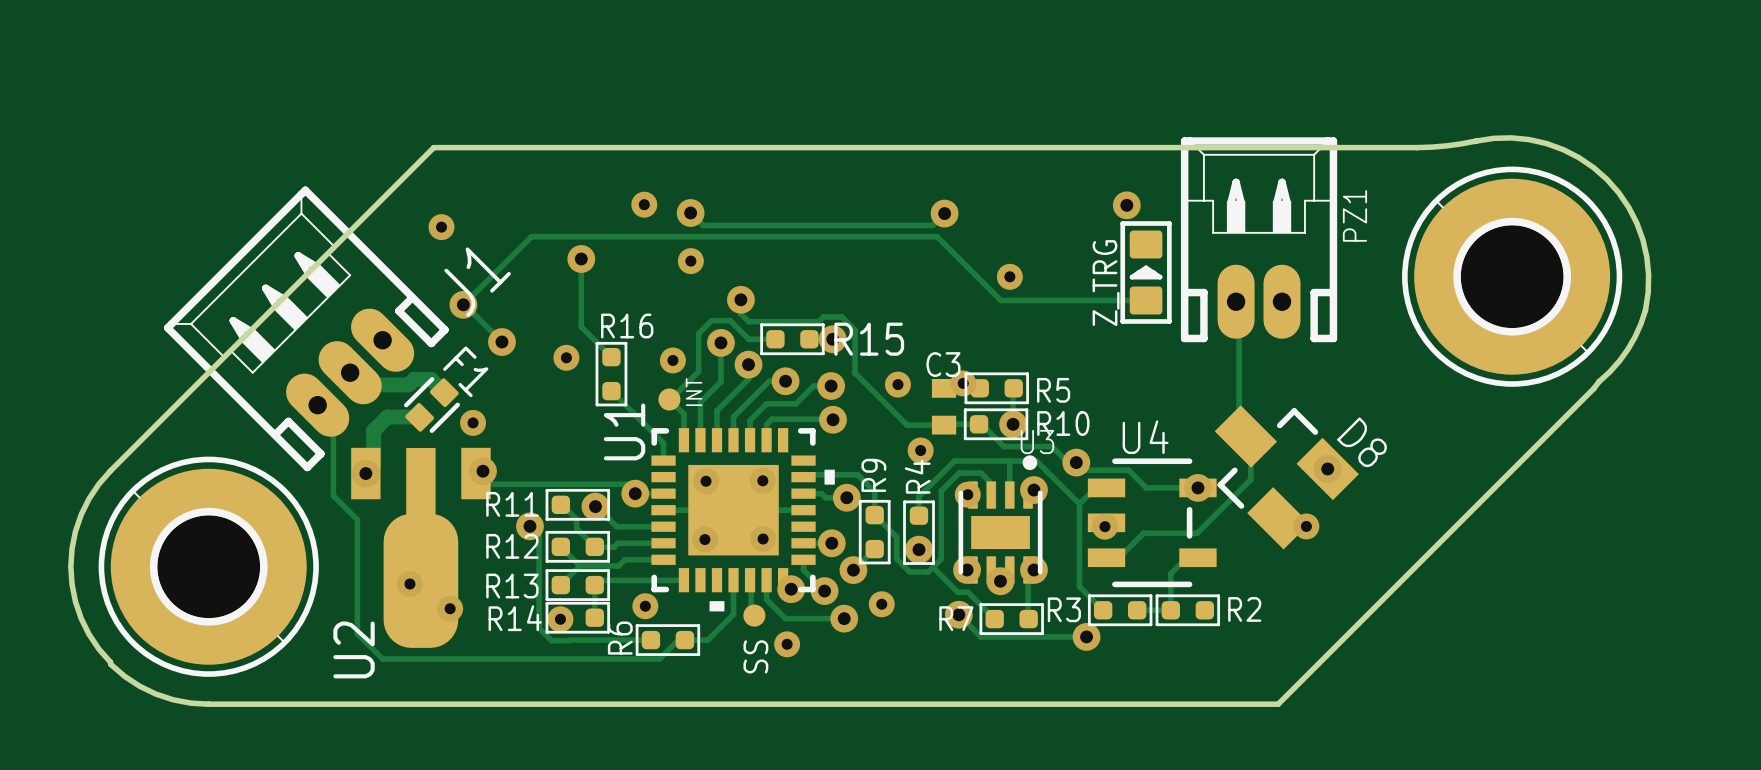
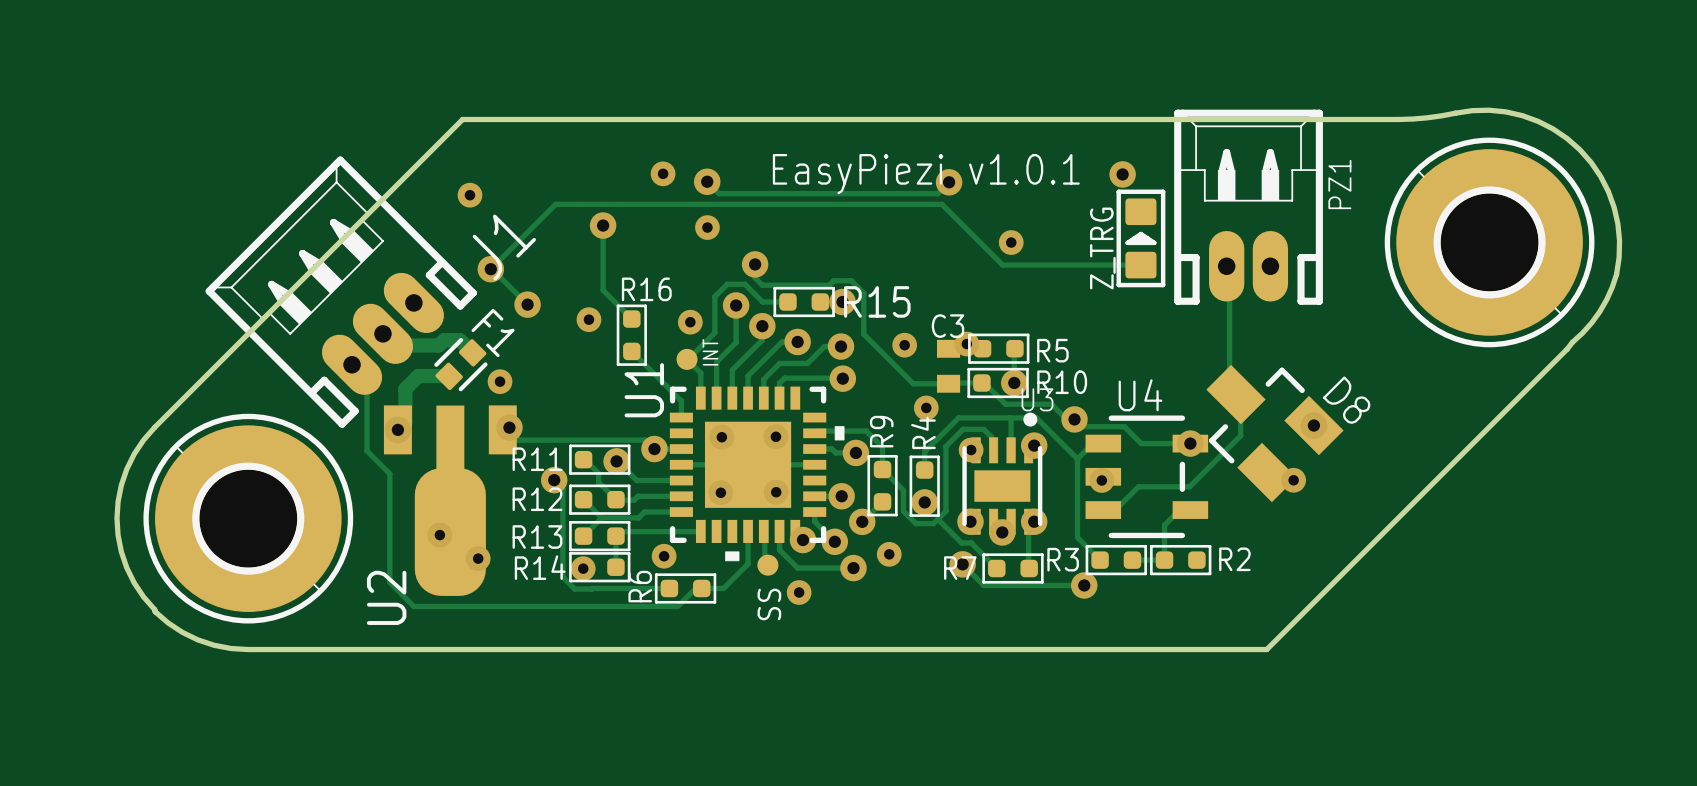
text: none -> EasyPiezi v1.0.1 (926, 174)

